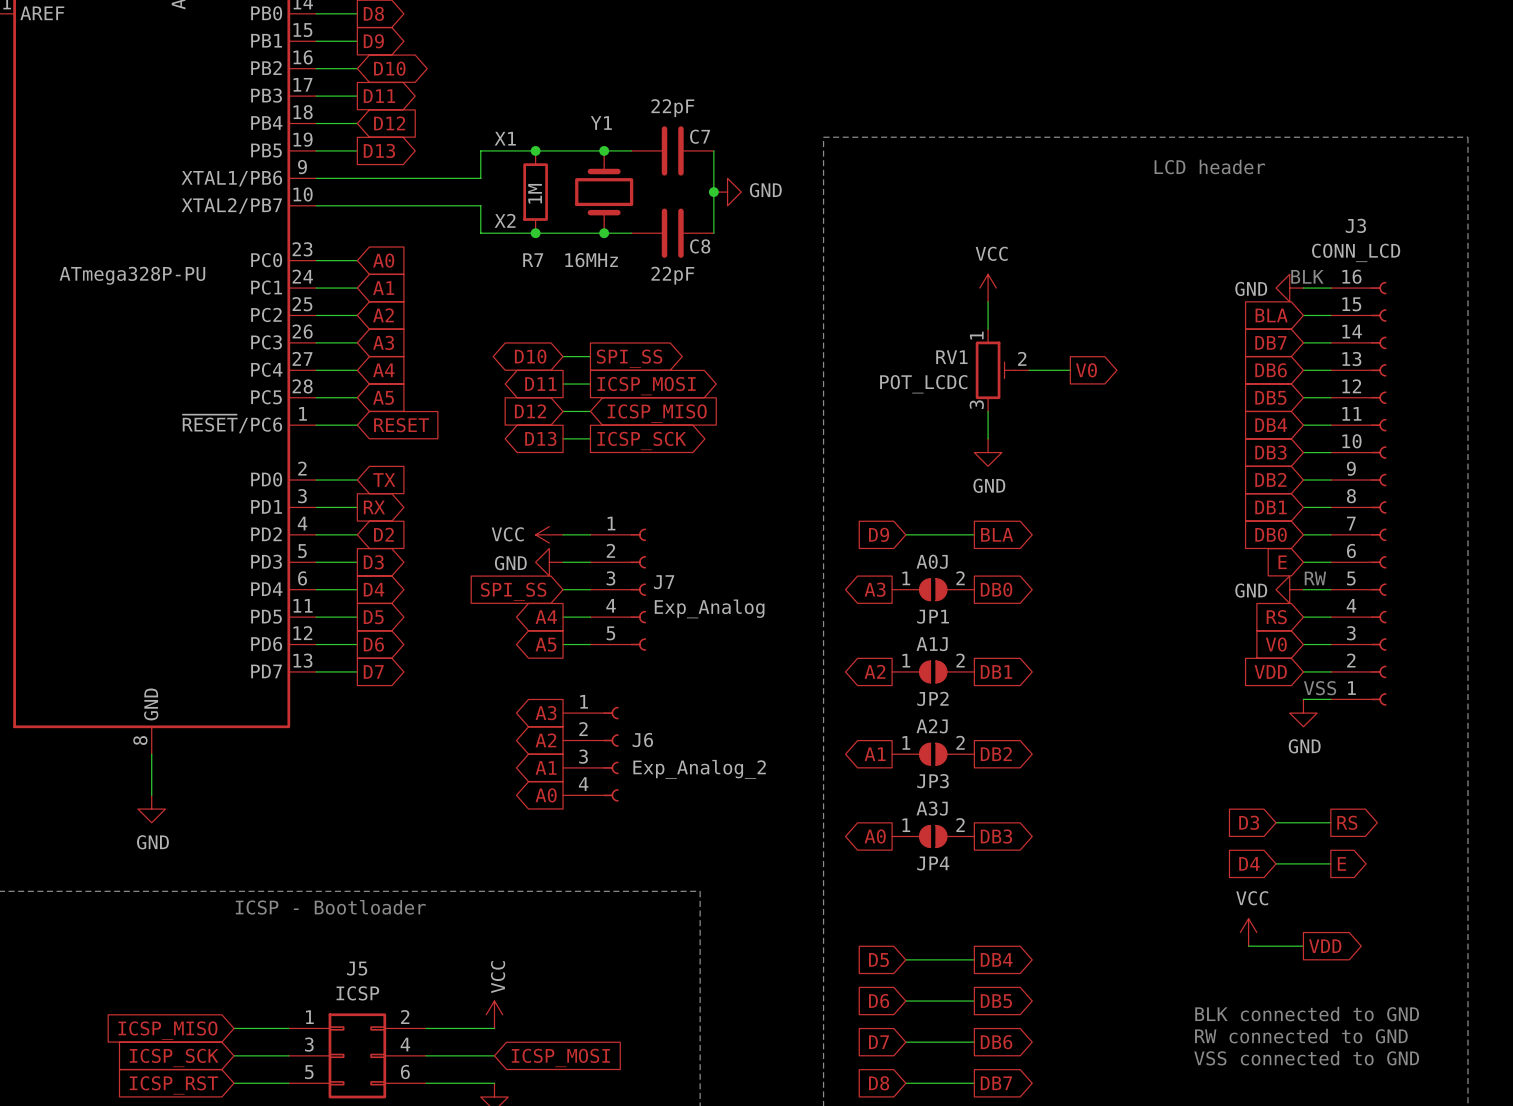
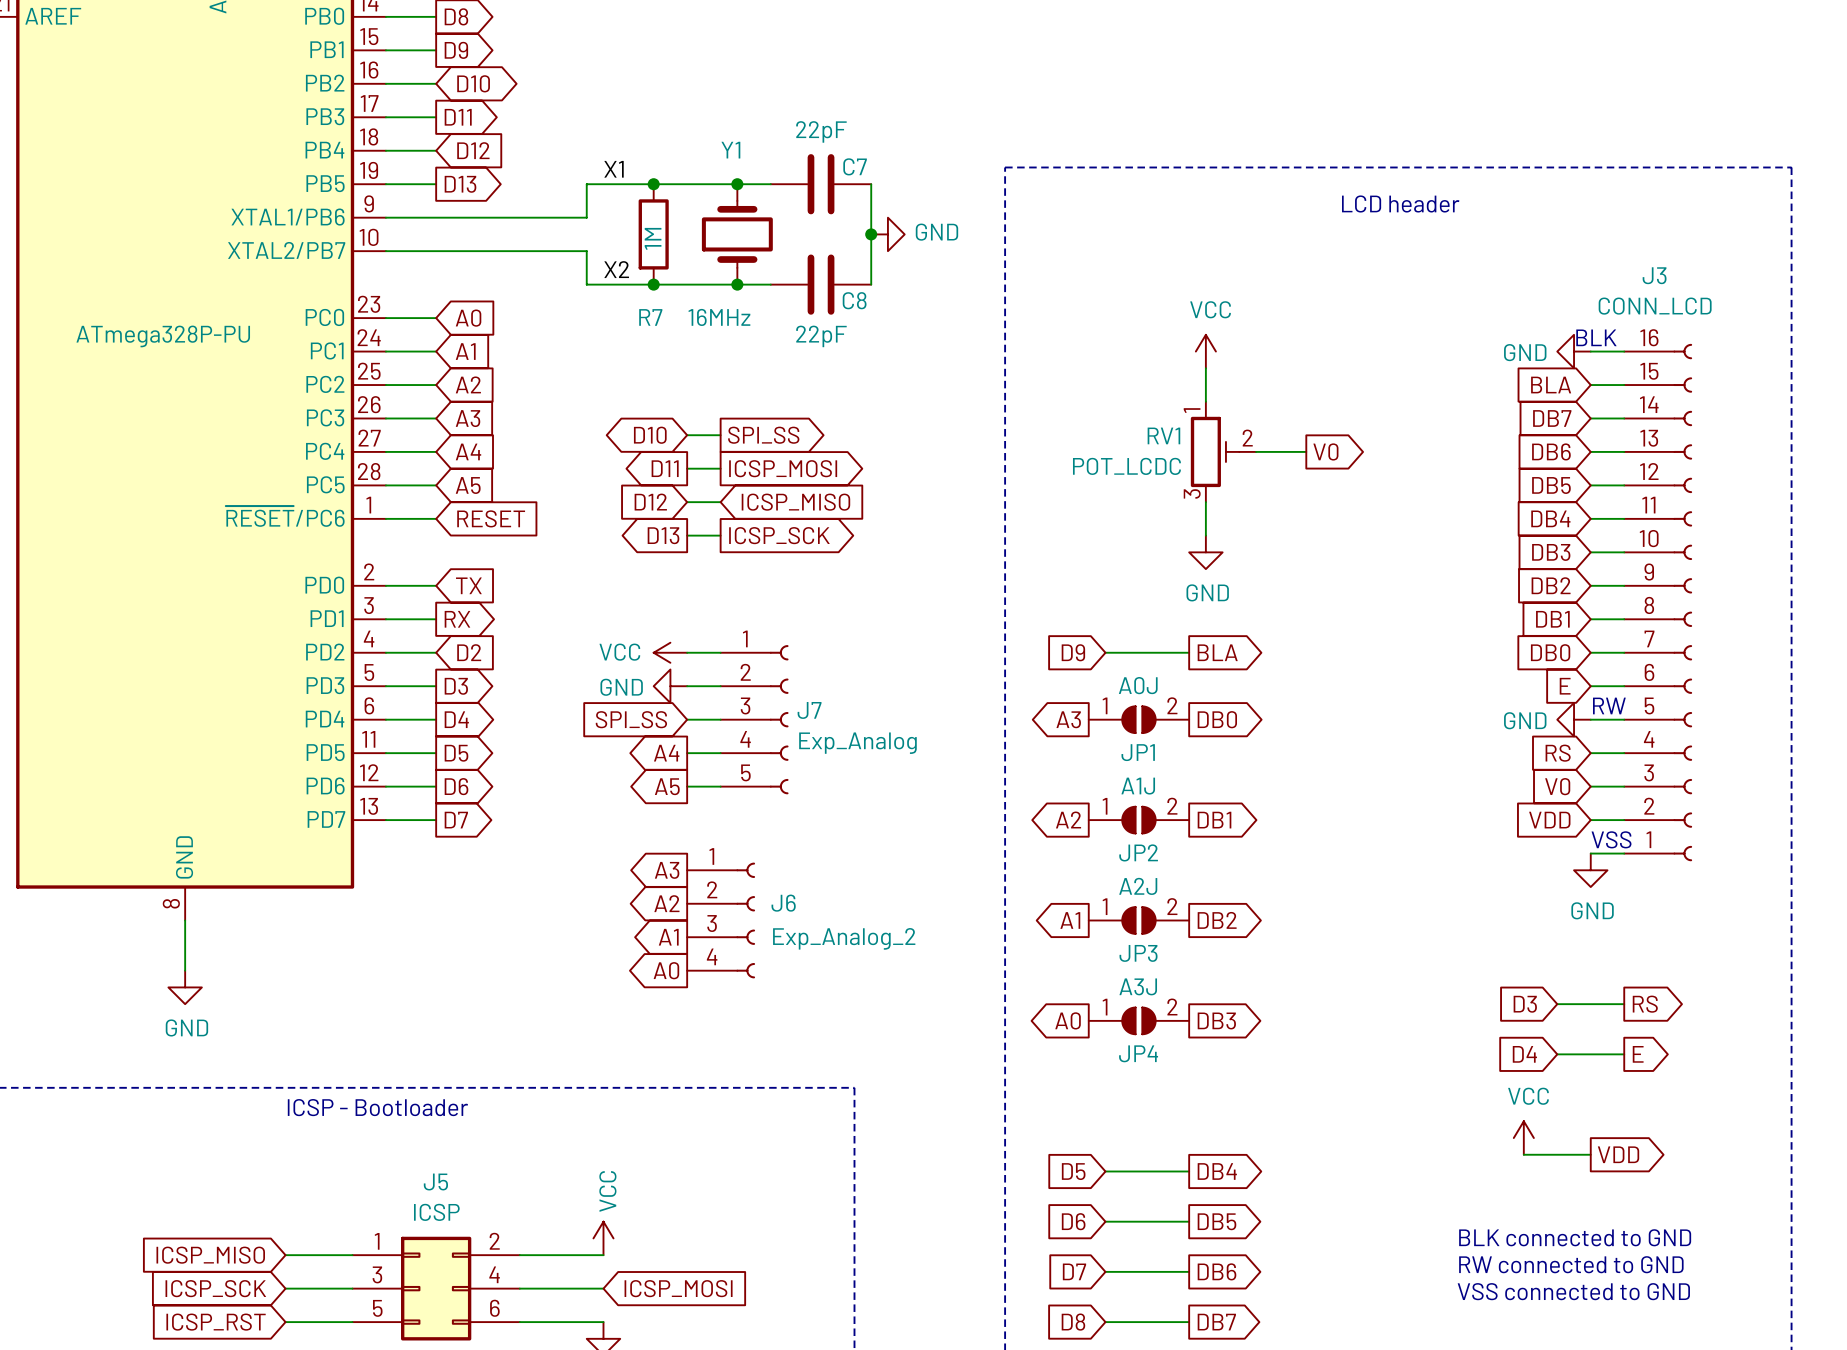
text position: LCD header (1209, 166) -> LCD header (1400, 203)

